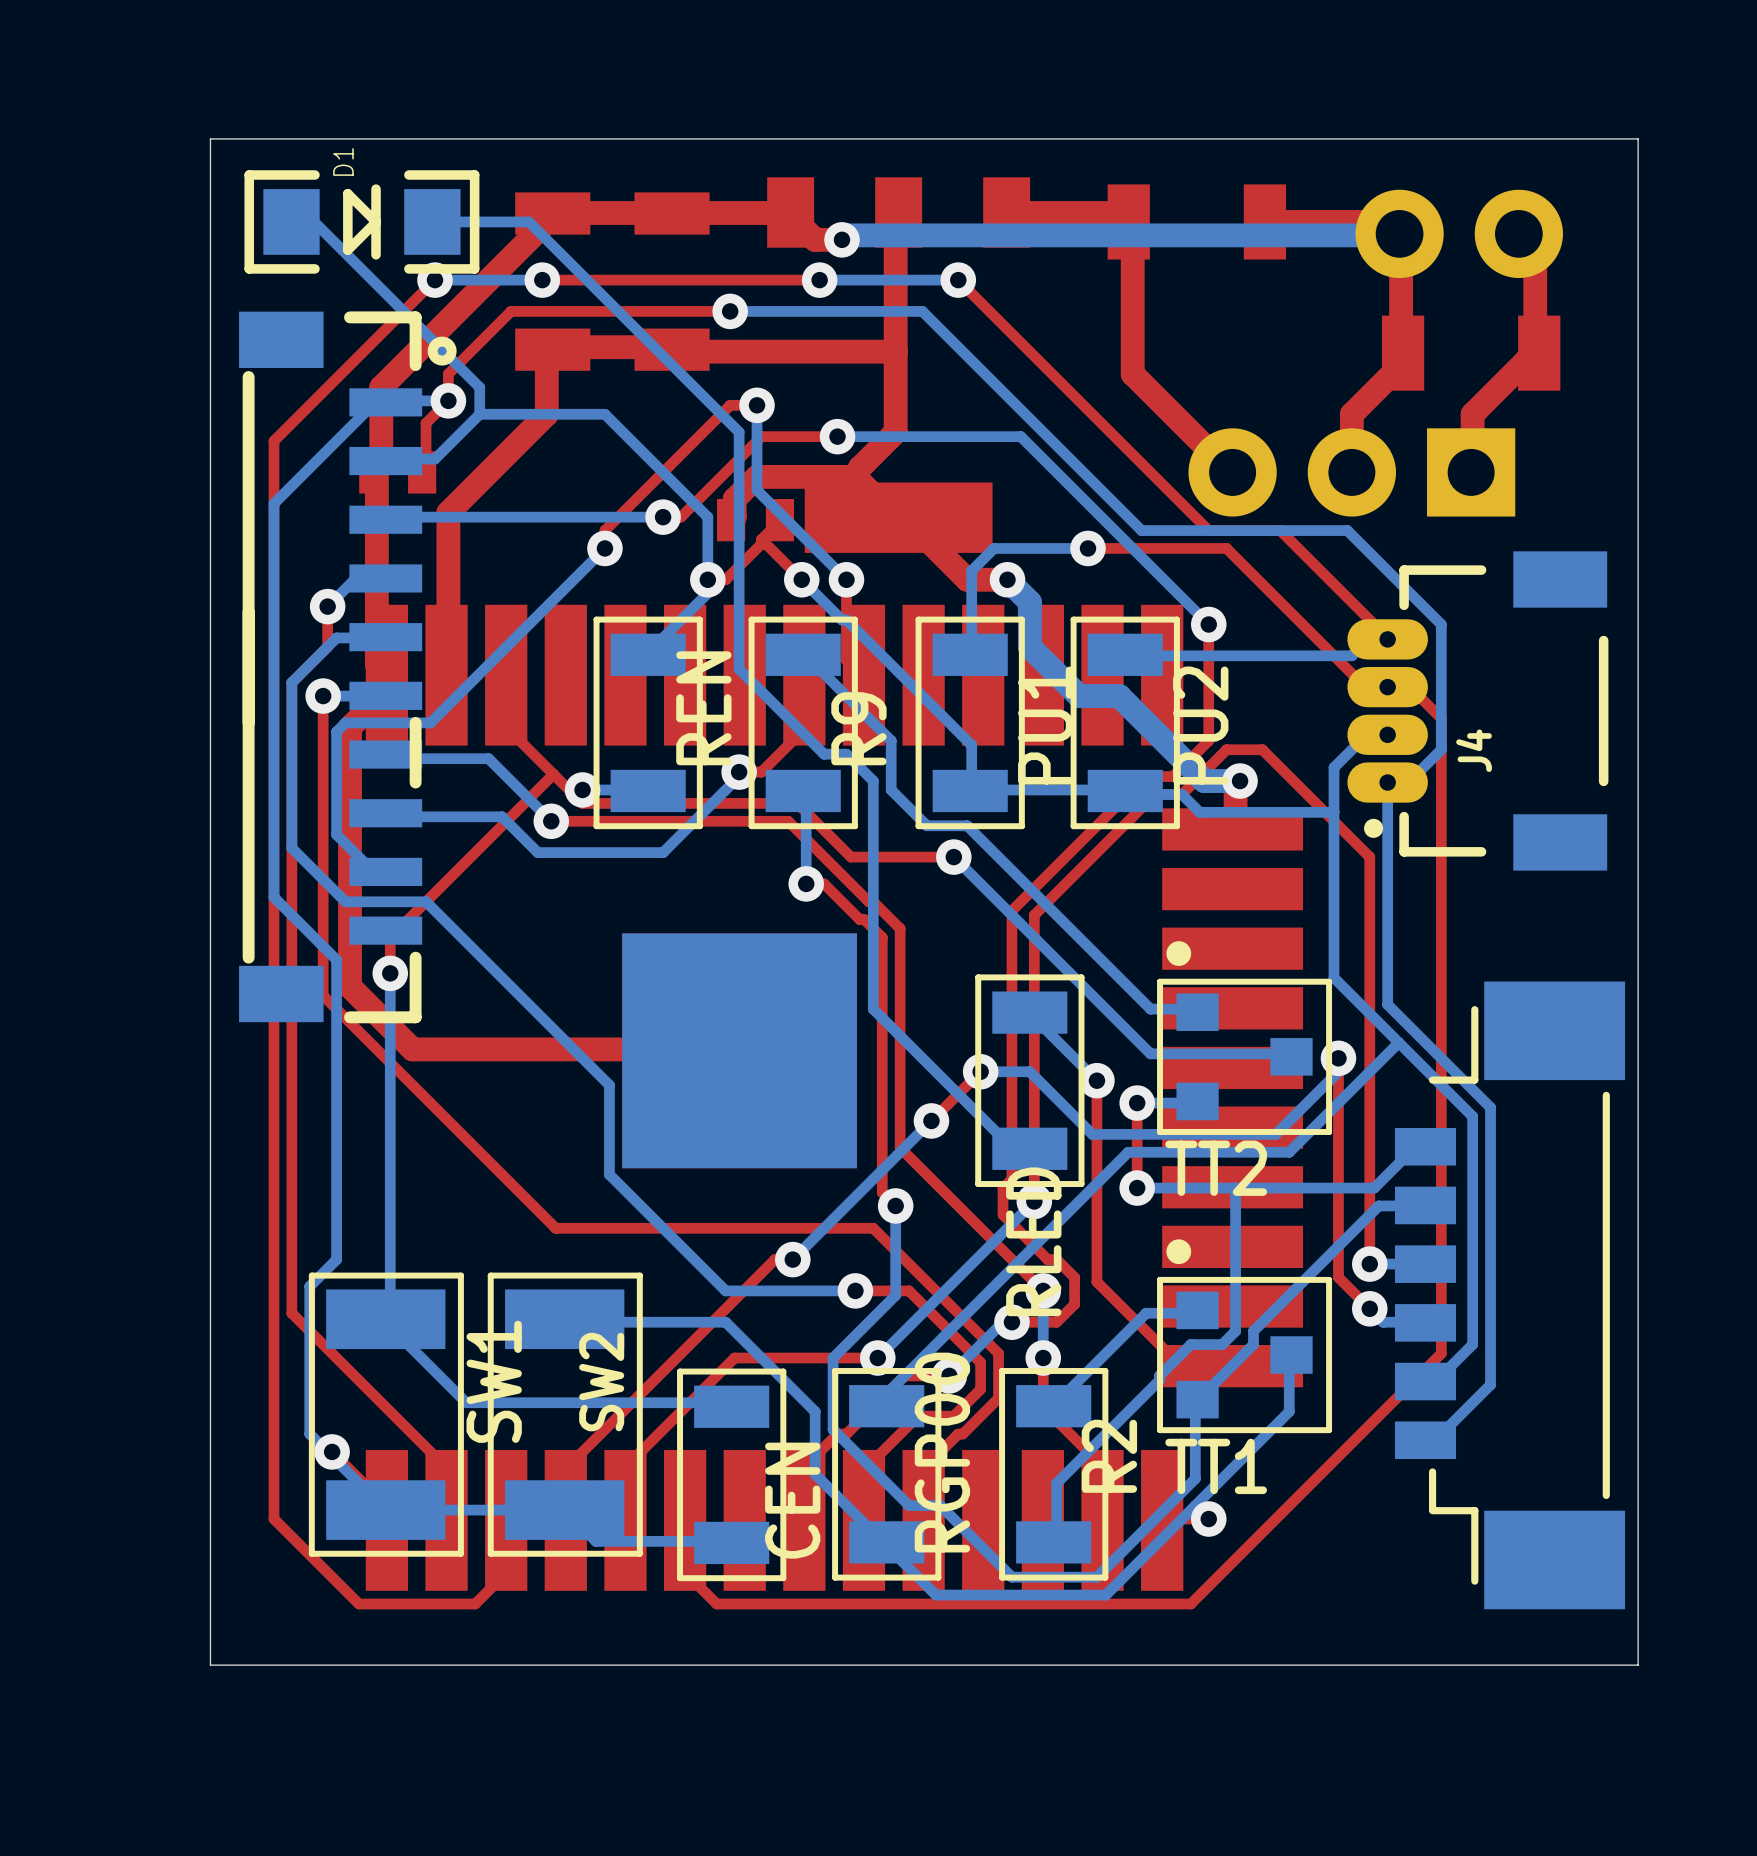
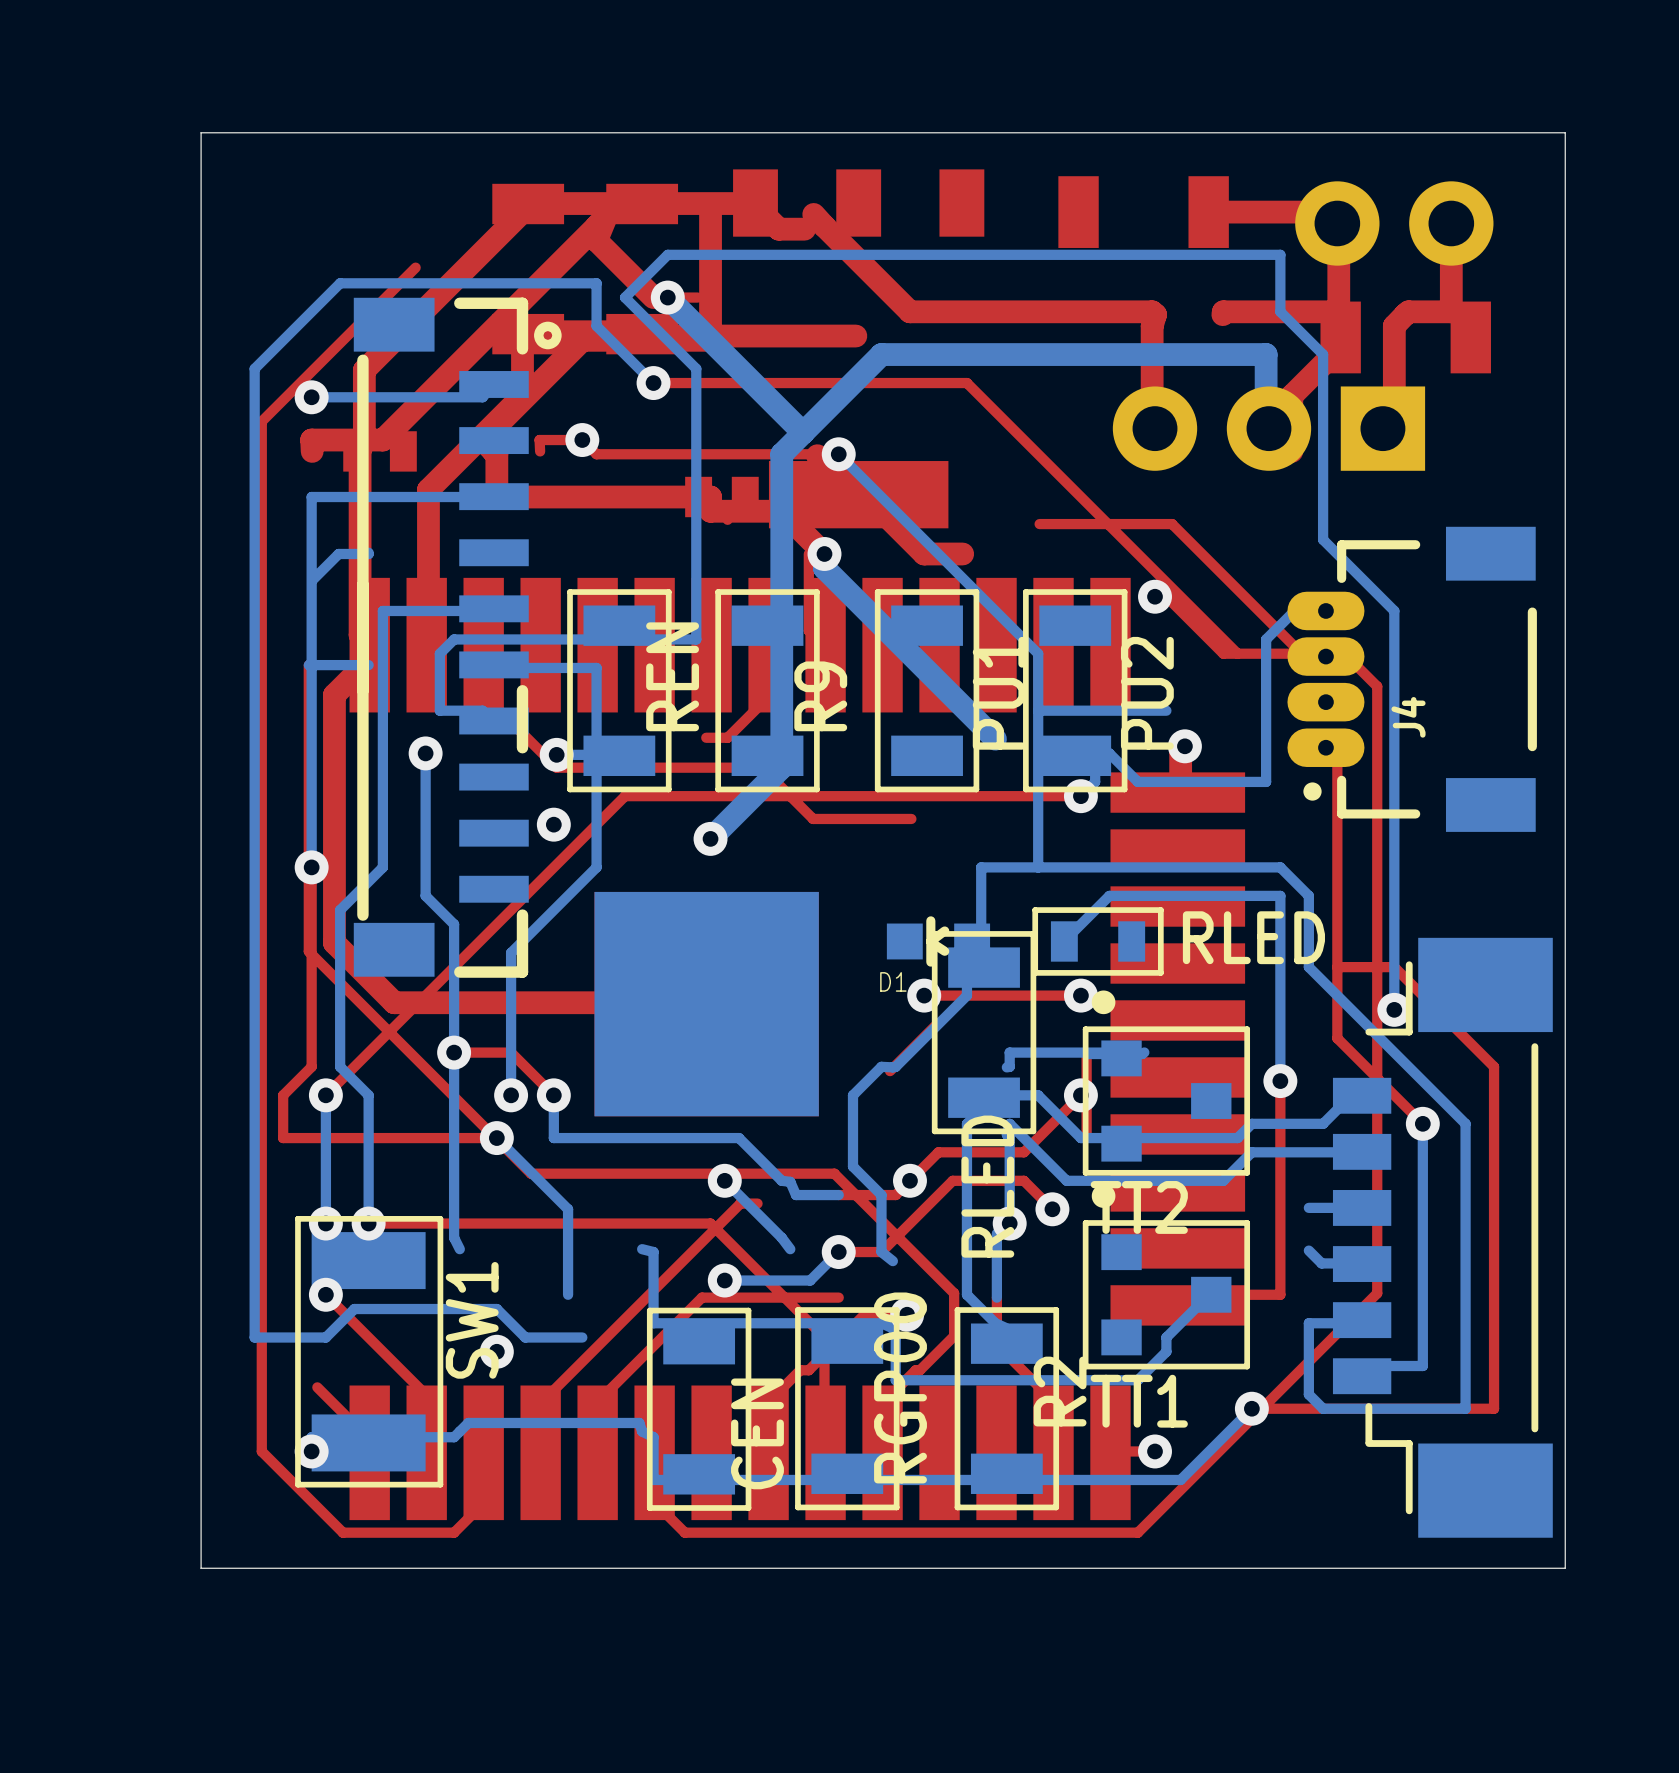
D1 name position: D1 (343, 162) -> D1 (893, 981)
D1 footprint: [244, 170, 480, 274] -> [886, 916, 991, 967]
top track: (898, 212) (895, 213) (895, 432) (859, 467) (855, 476) (757, 476) (734, 499) (734, 517) (731, 520) -> none
top track: (1006, 212) (1119, 213) (1128, 221) -> none
bottom track: (291, 221) (314, 221) (479, 387) (479, 414) -> none
bottom track: (432, 221) (528, 221) (739, 432) (739, 669) (824, 754) (846, 754) (873, 781) (873, 1009) (1011, 1147) (1029, 1148) -> none
top track: (1128, 221) (1132, 230) (1132, 374) (1232, 472) -> none
top track: none -> (710, 214) (710, 340) (582, 340) (482, 440) (496, 454) (496, 497) (710, 497) (710, 511) (781, 511) (824, 553)
top track: none -> (813, 214) (909, 311) (1152, 311) (1155, 314) (1152, 326) (1152, 425) (1155, 428)
bottom track: (1399, 233) (846, 235) (842, 239) -> none
top track: (1518, 233) (1535, 248) (1535, 351) (1539, 353) (1526, 360) (1472, 414) (1471, 472) -> (1451, 223) (1451, 311) (1408, 311) (1394, 326) (1394, 425) (1382, 428)
via: (842, 239) -> none
via: (434, 280) -> none
bottom track: (542, 280) (434, 280) -> none
via: (542, 280) -> none
top track: (819, 280) (542, 280) -> none
via: (819, 280) -> none
bottom track: (958, 280) (819, 280) -> none
top track: (958, 280) (1208, 530) (1280, 530) (1387, 639) -> none
via: (958, 280) -> none
top track: (683, 311) (511, 311) (448, 374) (448, 400) (426, 423) (426, 472) (422, 472) -> (653, 297) (596, 240) (607, 214) (382, 440) (311, 440) (312, 451)
bottom track: none -> (667, 297) (803, 432)
bottom track: (730, 311) (922, 311) (1141, 530) (1347, 530) (1441, 624) (1441, 749) (1410, 781) (1387, 782) (1387, 1004) (1490, 1107) (1490, 1384) (1436, 1438) (1425, 1440) -> (1422, 1123) (1422, 1366) (1365, 1366) (1362, 1376)
via position: (730, 311) -> (667, 297)
top track: none -> (1337, 311) (1223, 311) (1222, 314)
bottom track: (448, 400) (385, 400) (381, 405) (372, 405) (273, 503) (273, 897) (336, 959) (336, 1259) (309, 1286) (309, 1434) (385, 1510) (564, 1510) (596, 1541) (730, 1541) (731, 1542) -> none
via: (448, 400) -> none
bottom track: none -> (653, 383) (596, 326) (596, 283) (340, 283) (254, 368) (254, 1337) (325, 1337) (354, 1309) (496, 1309) (525, 1337) (582, 1337)
top track: none -> (653, 383) (966, 383) (1237, 653)
via: none -> (653, 383)
bottom track: none -> (494, 384) (482, 397) (311, 397)
bottom track: (757, 405) (757, 490) (846, 579) -> none
top track: (757, 405) (730, 405) (604, 530) (604, 548) -> none
via: (757, 405) -> none
bottom track: (479, 414) (434, 459) (385, 459) (385, 461) -> none
bottom track: (479, 414) (604, 414) (707, 517) (707, 593) (648, 654) -> none
via: none -> (311, 397)
bottom track: (837, 436) (1020, 436) (1208, 624) -> none
top track: (837, 436) (761, 436) (680, 517) (663, 517) -> none
via: (837, 436) -> none
bottom track: none -> (1268, 428) (1266, 425) (1266, 354) (881, 354) (781, 454) (781, 767) (710, 838)
via: none -> (582, 440)
top track: none -> (540, 451) (539, 440) (582, 440) (596, 454) (838, 454)
part position: (1351, 472) -> (1268, 428)
bottom track: none -> (838, 454) (1038, 653) (1038, 867)
via: none -> (838, 454)
bottom track: (663, 517) (385, 517) (385, 519) -> none
via: (663, 517) -> none
bottom track: none -> (494, 496) (311, 497) (311, 867)
bottom track: (604, 548) (430, 722) (345, 722) (336, 731) (336, 834) (372, 870) (385, 871) -> none
via: (604, 548) -> none
bottom track: (1087, 548) (994, 548) (971, 570) (970, 654) -> none
via: (1087, 548) -> none
via: (707, 579) -> none
bottom track: (801, 579) (842, 620) (846, 620) (971, 745) (970, 790) (1123, 789) (1128, 794) (1181, 794) (1199, 812) (1333, 812) -> none
top track: (801, 579) (765, 543) (761, 543) (725, 579) (707, 579) -> none
via: (801, 579) -> none
via position: (846, 579) -> (824, 553)
bottom track: none -> (824, 553) (824, 568) (995, 739)
bottom track: (1007, 579) (1029, 602) (1029, 646) (1079, 696) (1119, 696) (1204, 781) (1240, 781) -> none
via: (1007, 579) -> none
top track: (327, 606) (327, 646) (291, 682) (291, 1313) (443, 1465) (443, 1519) (446, 1520) -> (325, 1294) (425, 1394) (426, 1452)
via: (327, 606) -> none
top track: (1208, 624) (1208, 740) (1172, 776) (1146, 776) (1011, 910) (1011, 1179) (1003, 1188) (1003, 1214) (1047, 1259) (1056, 1259) (1074, 1277) (1074, 1304) (1056, 1322) (1011, 1322) -> none
top track: none -> (1166, 596) (1223, 653) (1323, 653) (1325, 656)
bottom track: (385, 637) (336, 637) (291, 682) (291, 848) (345, 901) (426, 901) (609, 1085) (609, 1174) (725, 1290) (855, 1290) -> none
bottom track: none -> (494, 608) (482, 610) (382, 610) (382, 867) (340, 910) (340, 1066) (368, 1095) (368, 1223)
bottom track: (1387, 639) (1387, 642) (1365, 642) (1351, 655) (1125, 654) -> (1325, 610) (1294, 610) (1266, 639) (1266, 781) (1137, 781) (1109, 753) (1098, 747) (1095, 753) (1095, 781) (1080, 796)
bottom track: (803, 654) (891, 740) (891, 789) (926, 825) (967, 825) (1150, 1009) (1195, 1009) (1197, 1012) -> none
part position: (347, 667) -> (457, 637)
bottom track: none -> (494, 664) (496, 667) (596, 667) (596, 867) (511, 952) (511, 1095)
via: (323, 696) -> none
bottom track: (1387, 734) (1365, 736) (1333, 767) (1333, 977) (1472, 1116) (1472, 1344) (1436, 1380) (1425, 1381) -> (892, 1261) (881, 1252) (881, 1195) (852, 1166) (852, 1095) (881, 1066) (895, 1066) (966, 995) (966, 952) (972, 941) (981, 938) (981, 867) (1280, 867) (1308, 895) (1308, 967) (1465, 1123) (1465, 1408) (1323, 1408) (1308, 1394) (1308, 1323) (1351, 1323) (1362, 1320)
bottom track: none -> (1166, 710) (1038, 710)
bottom track: (385, 754) (385, 758) (488, 758) (551, 821) -> none
bottom track: none -> (494, 720) (482, 710) (439, 710) (439, 653) (454, 639) (696, 639) (696, 368) (625, 297) (667, 254) (1280, 254) (1280, 311) (1323, 354) (1323, 539) (1394, 610) (1394, 1009)
bottom track: (739, 772) (739, 776) (663, 852) (537, 852) (502, 816) (385, 816) (385, 813) -> none
via: (739, 772) -> none
top track: (553, 774) (390, 937) (390, 973) -> none
top track: none -> (1325, 747) (1337, 753) (1337, 1038) (1422, 1123)
bottom track: none -> (425, 753) (425, 895) (454, 924) (454, 1237) (459, 1249)
via: none -> (425, 753)
bottom track: (803, 790) (806, 794) (806, 883) -> none
top track: (551, 821) (788, 821) (868, 901) (873, 901) (900, 928) (900, 1147) (1043, 1290) -> none
via position: (551, 821) -> (553, 824)
top track: none -> (1080, 796) (625, 796) (325, 1095)
via: none -> (1080, 796)
bottom track: (953, 857) (1150, 1053) (1289, 1053) (1291, 1056) -> none
via: (953, 857) -> none
via: none -> (710, 838)
top track: (806, 883) (824, 883) (859, 919) (864, 919) (882, 937) (882, 1192) (895, 1205) -> none
via: (806, 883) -> none
top track: none -> (311, 867) (311, 1066) (283, 1095) (283, 1138) (496, 1138)
via: none -> (311, 867)
bottom track: (390, 973) (390, 1317) (385, 1319) (385, 1322) (466, 1402) (730, 1402) (731, 1406) -> none
via: (390, 973) -> none
bottom track: none -> (1064, 941) (1109, 895) (1280, 895) (1280, 1081)
RLED: none -> (1098, 941)
bottom track: (1029, 1012) (1096, 1080) -> none
top track: none -> (1337, 967) (1394, 967) (1494, 1066) (1494, 1408) (1251, 1408)
TT2 position: (1244, 1038) -> (1166, 1083)
top track: none -> (1080, 995) (924, 995)
via: none -> (1080, 995)
bottom track: (1398, 1042) (1289, 1152) (1128, 1152) (886, 1393) (886, 1406) -> none
via: none -> (1394, 1009)
bottom track: (1338, 1058) (1338, 1071) (1275, 1134) (1092, 1134) (1029, 1071) (980, 1071) -> none
top track: (1338, 1058) (1338, 1277) (1369, 1308) -> none
via: (1338, 1058) -> none
via position: (980, 1071) -> (924, 995)
top track: (1096, 1080) (1096, 1281) (1177, 1362) (1231, 1362) (1232, 1366) -> (1280, 1081) (1280, 1294) (1180, 1294) (1177, 1305)
via: (1096, 1080) -> none
top track: none -> (454, 1052) (511, 1052) (553, 1095)
via: none -> (454, 1052)
via: (1137, 1103) -> none
bottom track: none -> (1121, 1058) (1109, 1052) (1009, 1052) (1009, 1066) (1006, 1067)
bottom track: (931, 1120) (792, 1259) -> none
via: (931, 1120) -> none
via: none -> (1280, 1081)
bottom track: none -> (325, 1095) (325, 1223)
via: none -> (325, 1095)
via: none -> (511, 1095)
bottom track: none -> (553, 1095) (553, 1138) (739, 1138) (781, 1180) (790, 1181) (796, 1195) (838, 1195)
via: none -> (553, 1095)
top track: none -> (1080, 1095) (1023, 1152) (938, 1152) (895, 1195) (838, 1195)
via: none -> (1080, 1095)
bottom track: (1425, 1146) (1414, 1147) (1374, 1188) (1137, 1188) -> (1362, 1095) (1351, 1095) (1323, 1123) (1251, 1123) (1237, 1138) (1123, 1138) (1121, 1143) (1109, 1138) (1080, 1138) (1038, 1095) (995, 1095) (966, 1123) (966, 1294) (995, 1323) (1006, 1328)
via: none -> (1422, 1123)
via: (1137, 1188) -> none
bottom track: (1235, 1188) (1235, 1331) (1222, 1344) (1190, 1344) (1159, 1375) (1159, 1380) (1056, 1483) (1056, 1541) (1053, 1542) -> none
bottom track: none -> (496, 1138) (568, 1209) (568, 1294)
via: none -> (496, 1138)
bottom track: (1034, 1201) (877, 1358) -> none
top track: (1034, 1201) (1034, 915) (1155, 794) (1181, 794) (1226, 749) (1262, 749) (1369, 857) (1369, 1264) -> none
via: (1034, 1201) -> none
via: (895, 1205) -> none
bottom track: (1378, 1205) (1253, 1331) (1253, 1344) (1197, 1399) (1195, 1402) (1195, 1478) (1096, 1577) (1011, 1577) (940, 1505) (909, 1505) (833, 1429) (833, 1358) (895, 1295) (895, 1205) -> (1317, 1152) (1251, 1152) (1223, 1180) (1066, 1180) (1009, 1123) (1006, 1134) (1009, 1138) (1009, 1223)
bottom track: none -> (724, 1180) (781, 1237) (790, 1249)
via: none -> (909, 1180)
via position: (792, 1259) -> (724, 1180)
via: (1369, 1264) -> none
top track: none -> (1052, 1209) (1023, 1180) (952, 1180) (881, 1252) (838, 1252)
via: none -> (1052, 1209)
via: none -> (325, 1223)
via: none -> (368, 1223)
top track: (855, 1290) (909, 1290) (980, 1362) (980, 1389) (953, 1416) (918, 1416) (864, 1469) (864, 1520) -> (368, 1223) (710, 1223) (824, 1337) (825, 1452)
via position: (855, 1290) -> (838, 1252)
via position: (1043, 1290) -> (1009, 1223)
bottom track: none -> (642, 1249) (653, 1252) (653, 1323) (881, 1323) (892, 1328) (895, 1337) (895, 1380) (1137, 1380) (1166, 1351) (1166, 1337) (1211, 1294)
via: (1369, 1308) -> none
bottom track: none -> (838, 1252) (810, 1280) (724, 1280)
bottom track: (1197, 1310) (1195, 1313) (1146, 1313) (1053, 1406) -> none
bottom track: (564, 1319) (564, 1322) (725, 1322) (815, 1411) (815, 1474) (882, 1541) (886, 1542) (886, 1545) (935, 1595) (1105, 1595) (1289, 1411) (1289, 1358) (1291, 1355) -> none
bottom track: (1011, 1322) (1003, 1322) (949, 1375) -> none
via: (1011, 1322) -> none
TT1 position: (1244, 1336) -> (1166, 1276)
via: none -> (724, 1280)
via: none -> (325, 1294)
via: (877, 1358) -> none
via: (1043, 1358) -> none
via: none -> (496, 1351)
SW2: (565, 1414) -> none
via: (332, 1451) -> none
bottom track: none -> (1251, 1408) (1180, 1479) (653, 1479) (653, 1437) (642, 1431) (639, 1422) (468, 1422) (454, 1437) (311, 1437) (311, 1451)
via: none -> (1251, 1408)
via: none -> (311, 1451)
board edge: (1638, 1641) (1638, 1665) (210, 1665) (210, 1641) -> (1565, 1568) (201, 1568)

